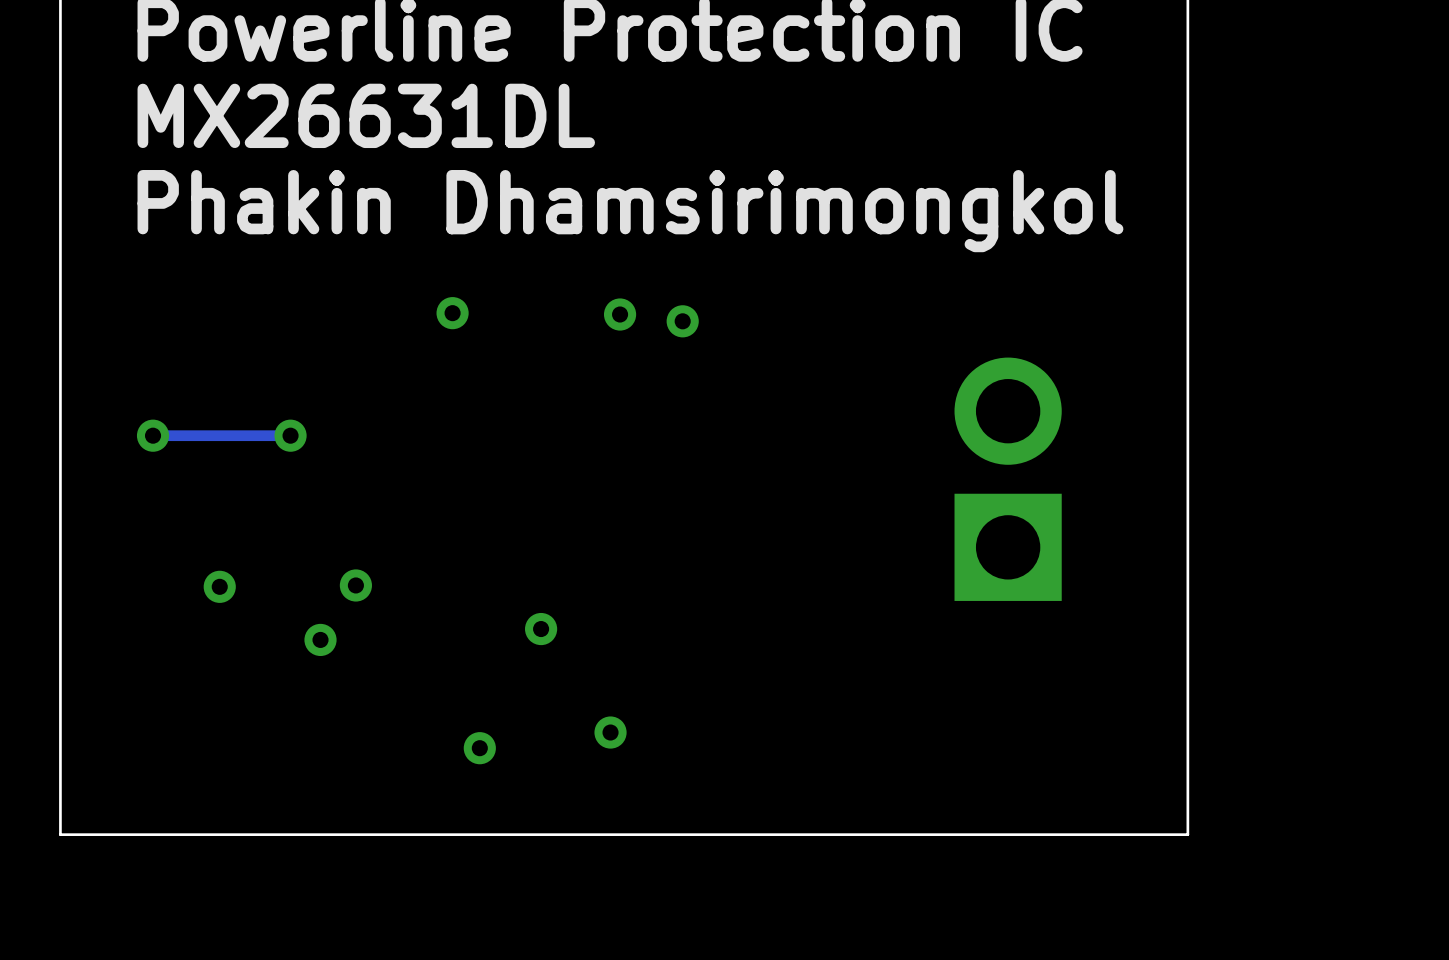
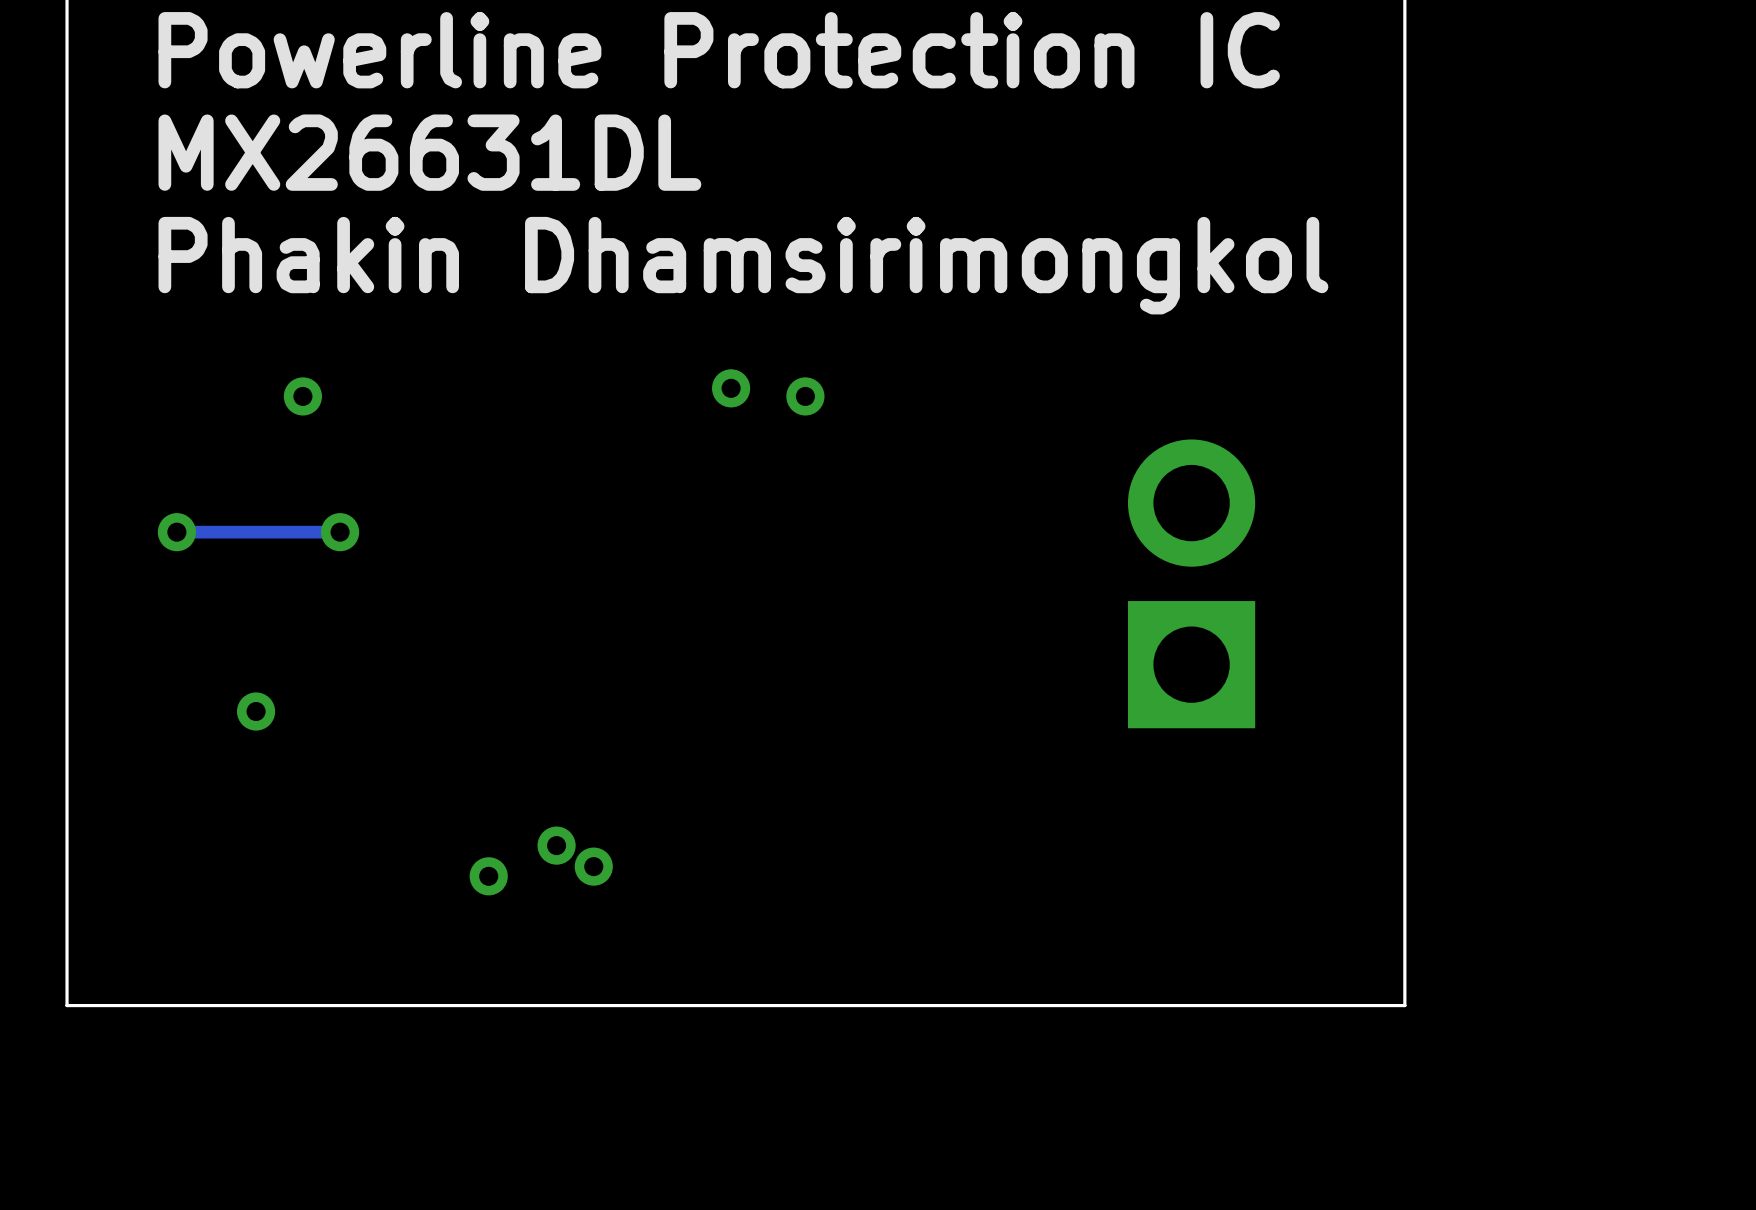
via: (452, 313) -> none
via: none -> (302, 396)
via: (355, 585) -> none
via: (541, 629) -> none
via: (320, 639) -> none
via: none -> (556, 845)
via: none -> (488, 876)
via: (610, 732) -> none
via position: (479, 748) -> (593, 866)

